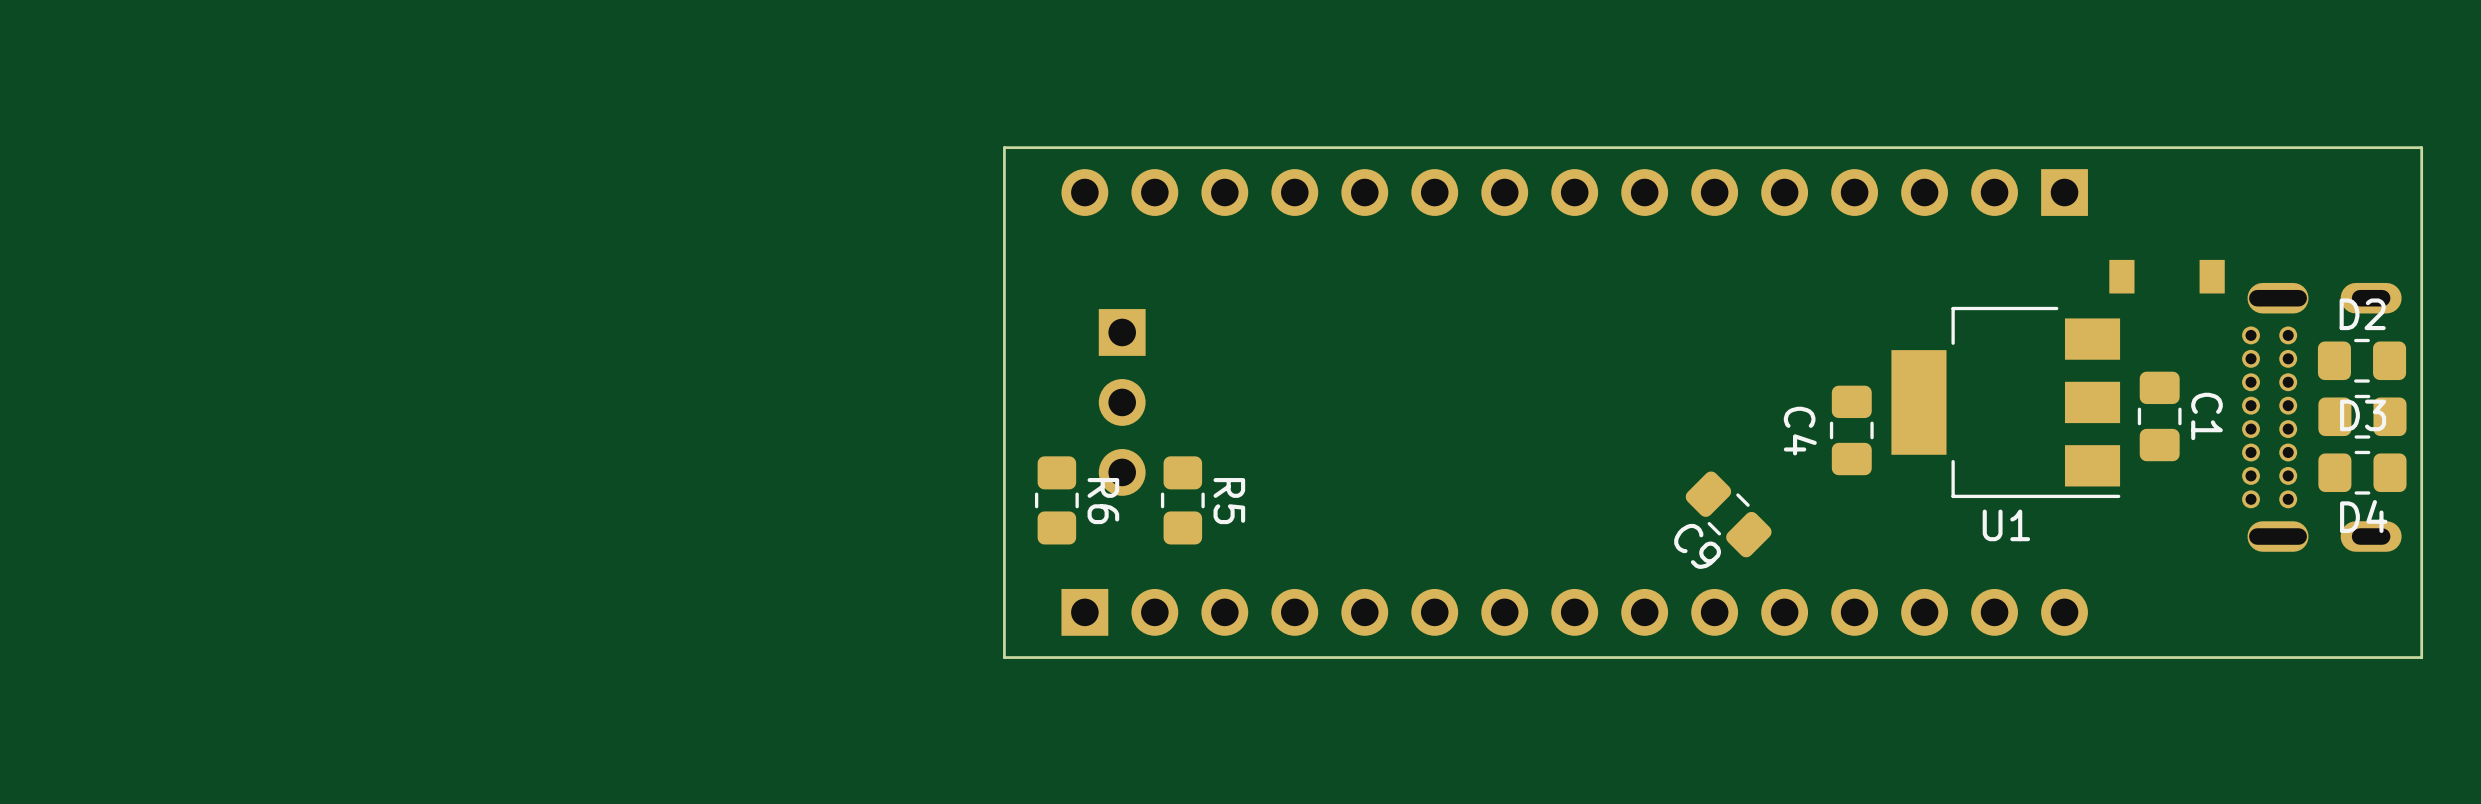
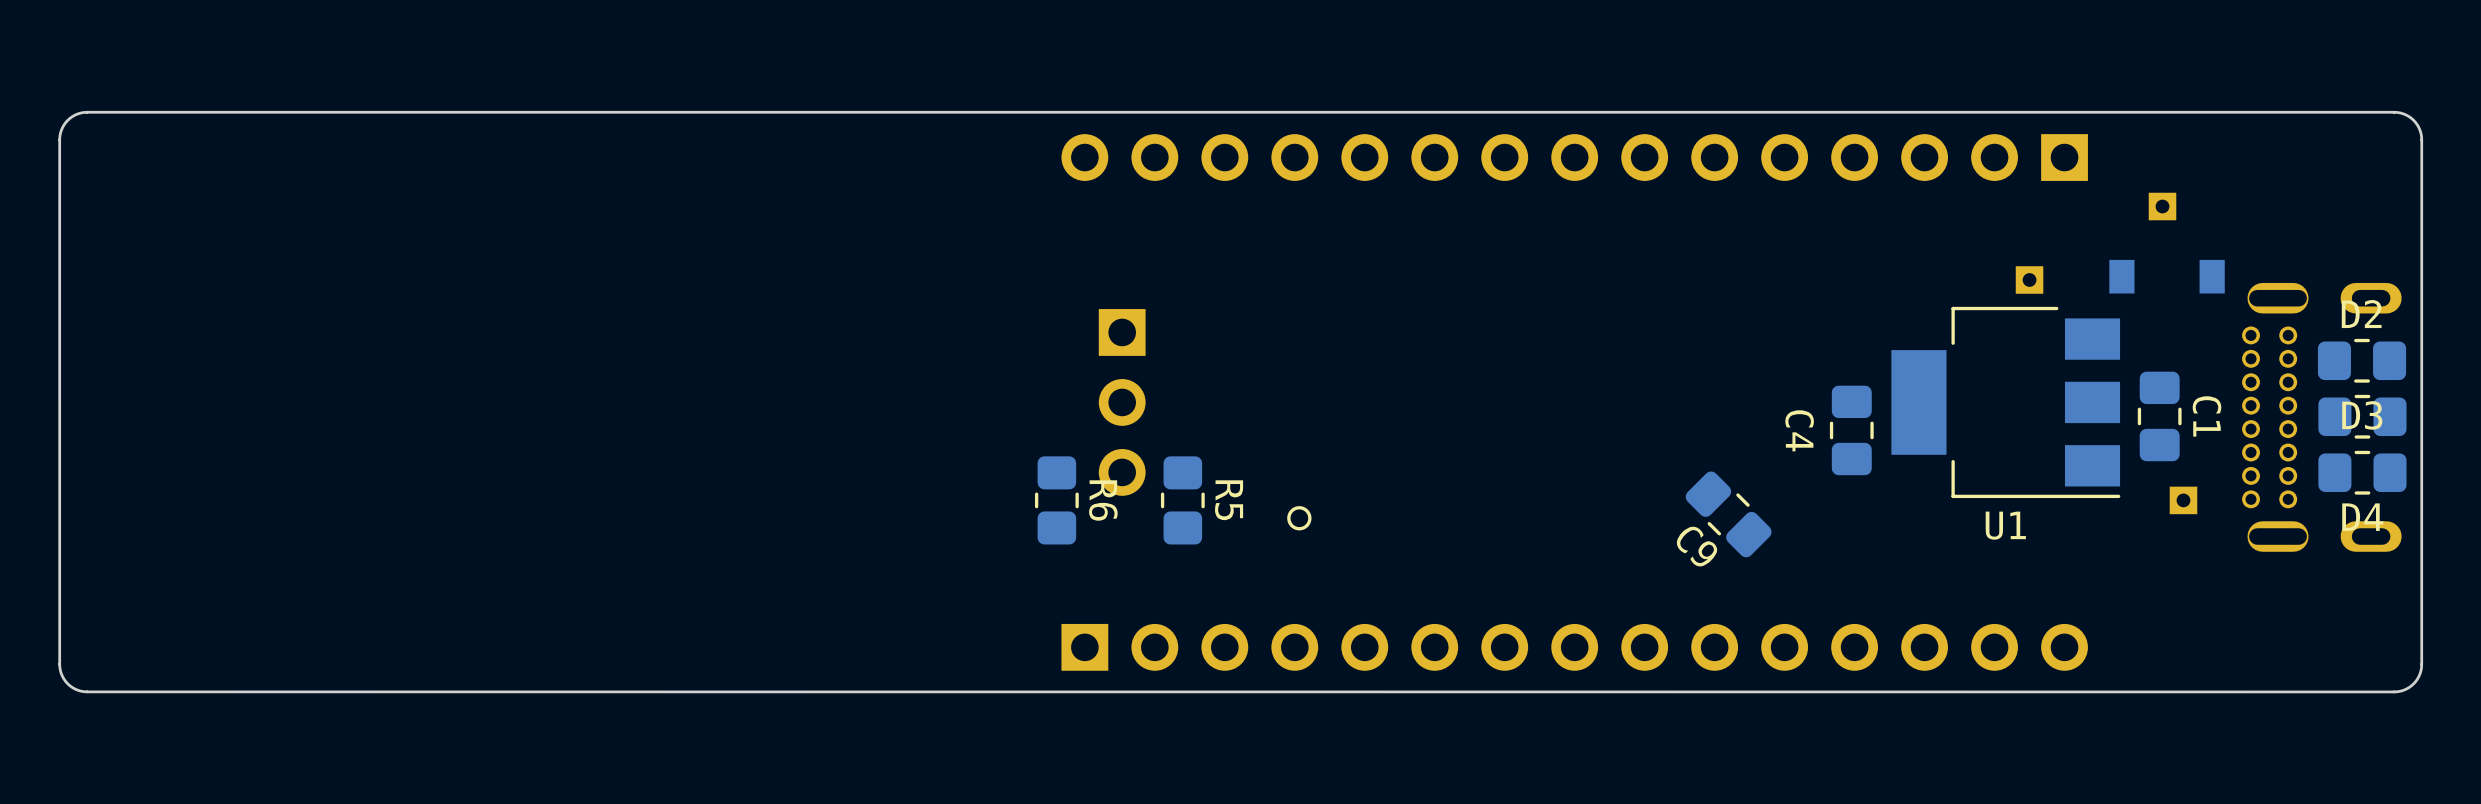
board edge: (2421, 147) (1004, 147) (1004, 657) (2421, 657) (2421, 147) -> (2394, 112) (2403, 113) (2413, 120) (2419, 127) (2421, 139) (2421, 664) (2420, 673) (2415, 681) (2408, 687) (2400, 691) (87, 691) (78, 690) (70, 685) (63, 678) (60, 670) (59, 139) (61, 130) (65, 122) (72, 116) (81, 112) (2394, 112)
part position: (1574, 192) -> (1574, 157)
part: none -> (2162, 206)
part: none -> (2029, 279)
part: none -> (2183, 500)
part: none -> (1299, 518)
part position: (1574, 612) -> (1574, 647)

